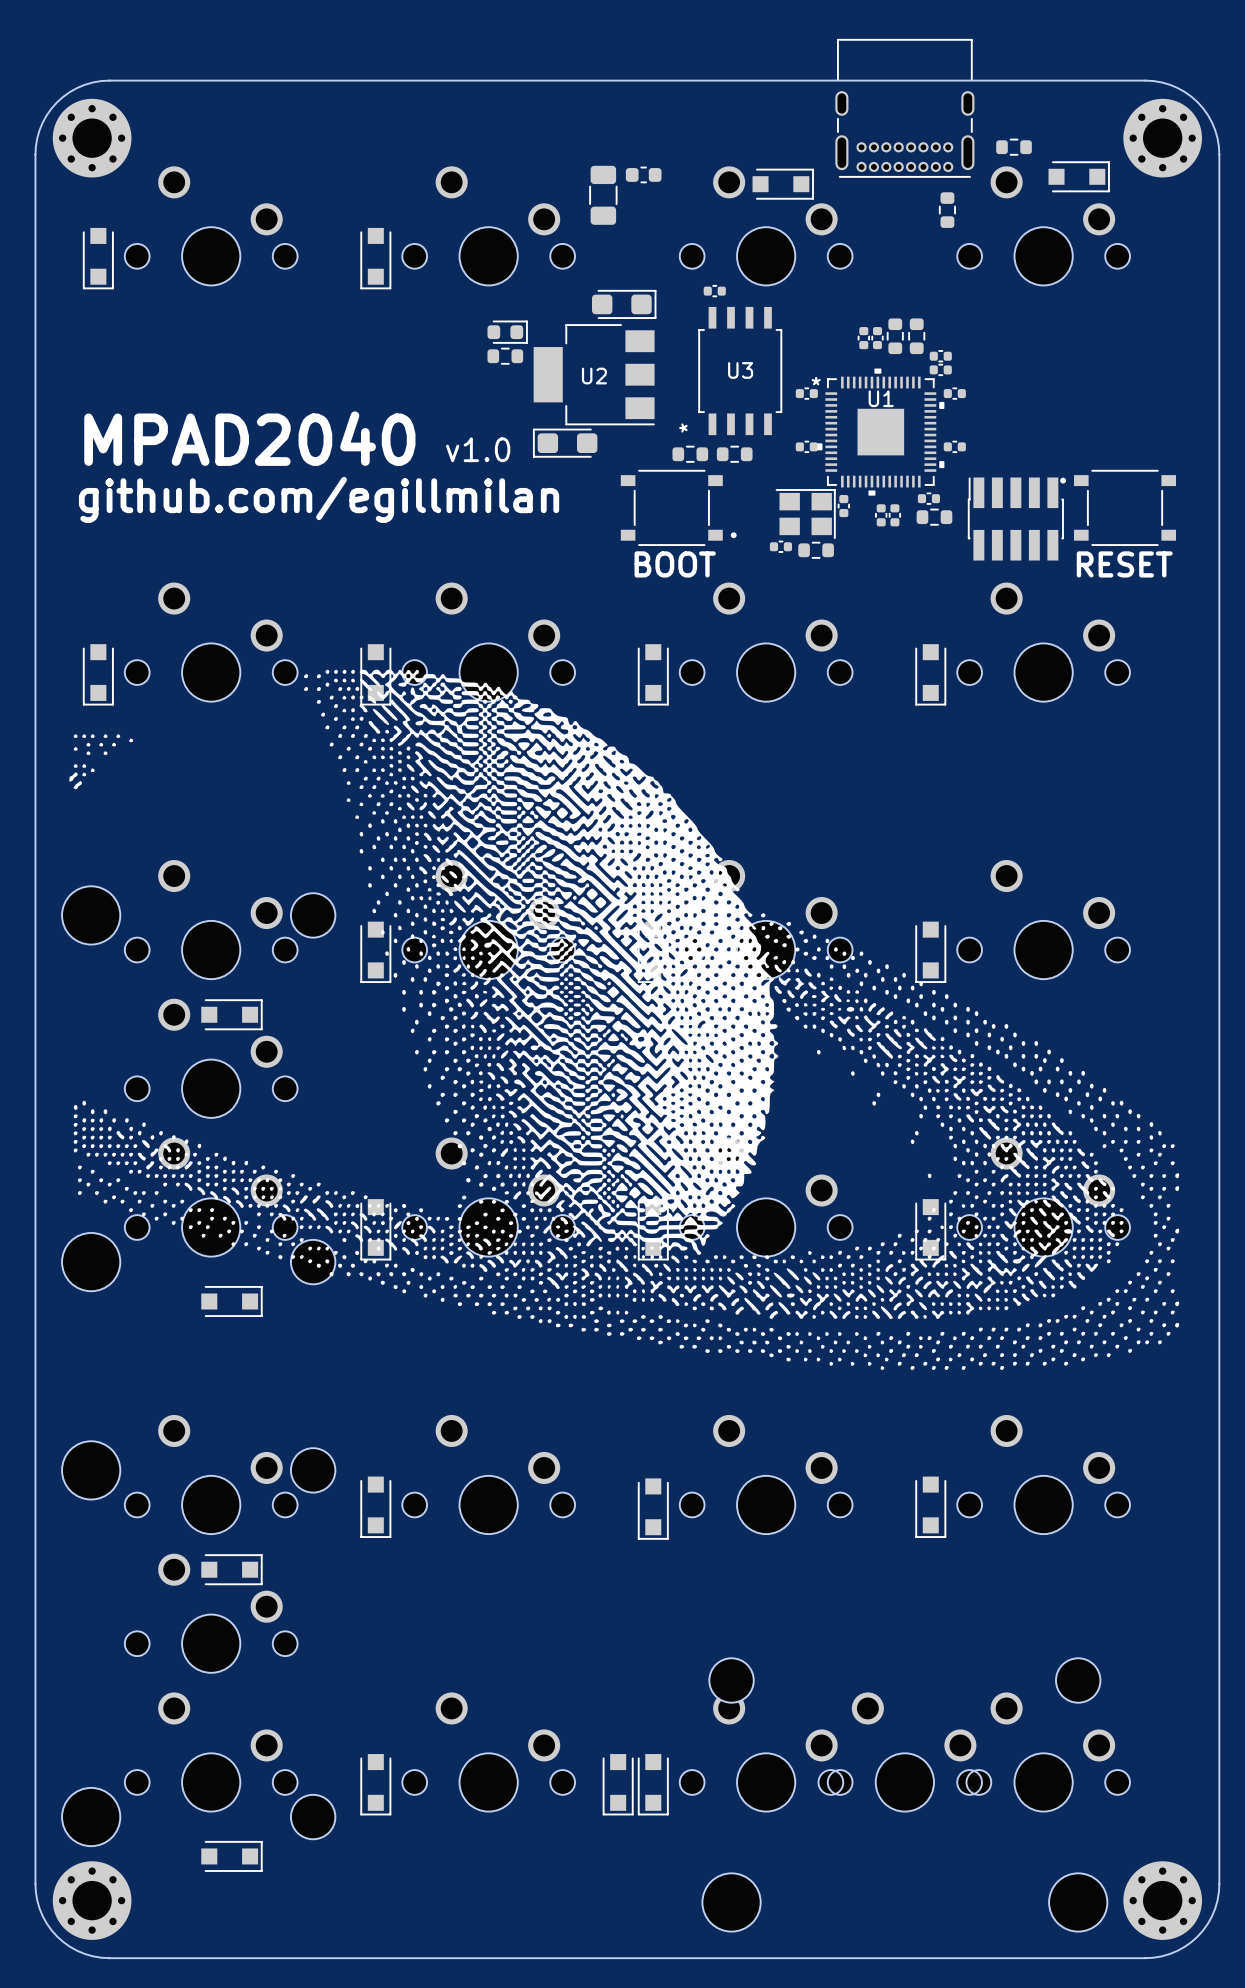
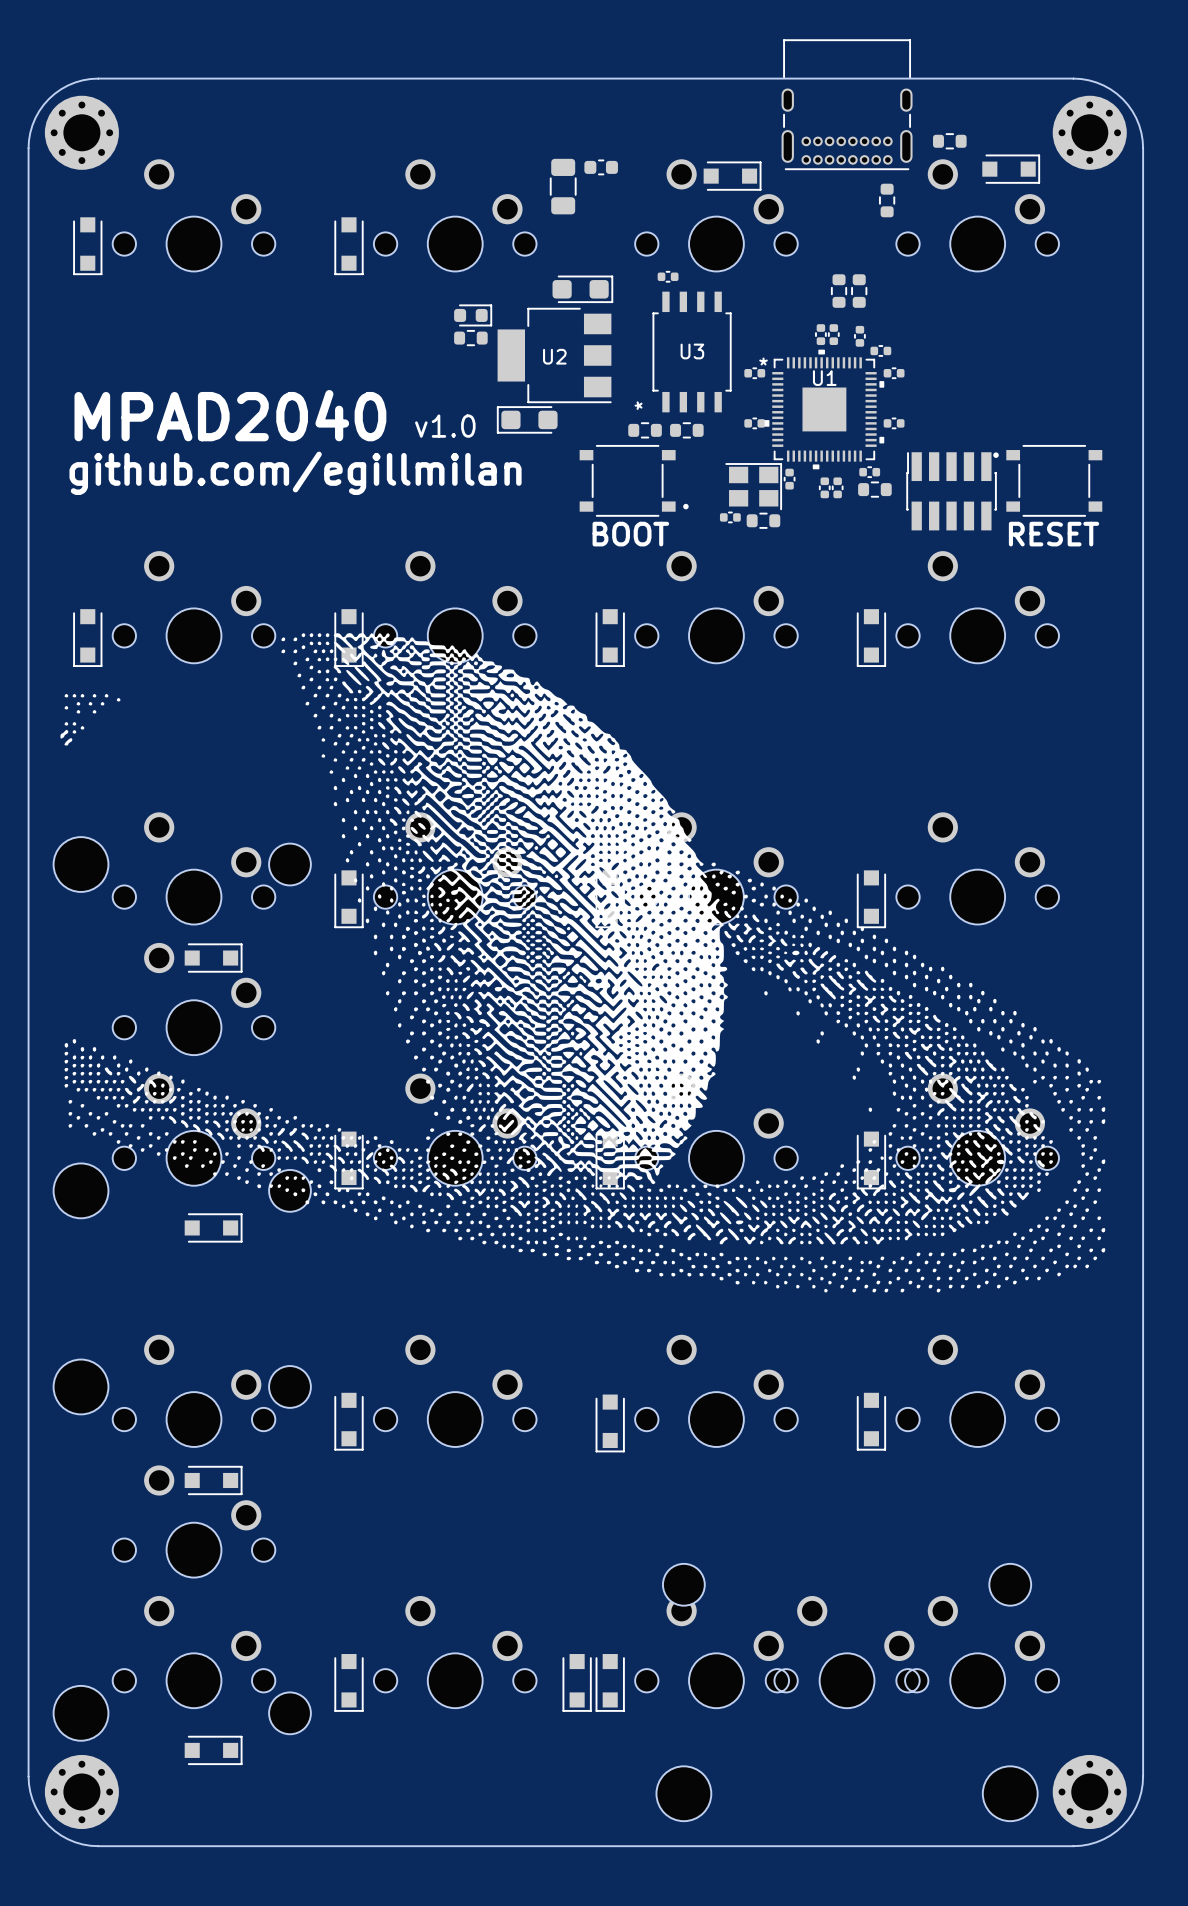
part: none -> (839, 291)
part: none -> (859, 291)
part: (895, 336) -> none
part: (916, 336) -> none
part: (863, 338) -> none
part: (877, 338) -> none
part: none -> (820, 334)
part: none -> (833, 334)
part: none -> (859, 336)
part: (940, 356) -> none

